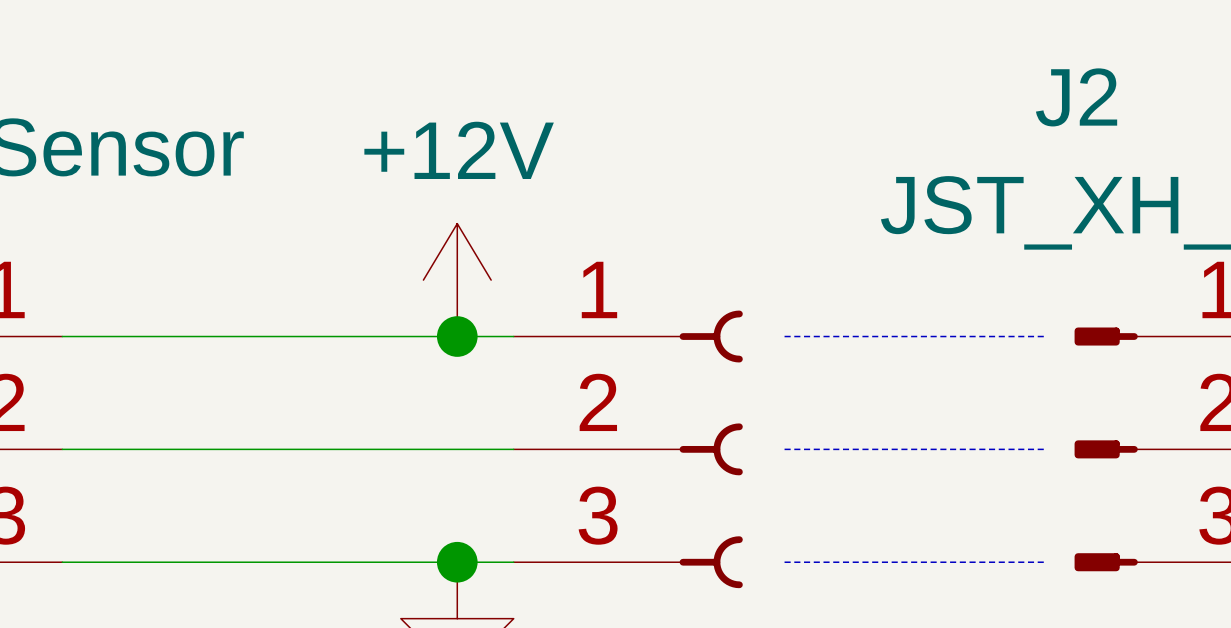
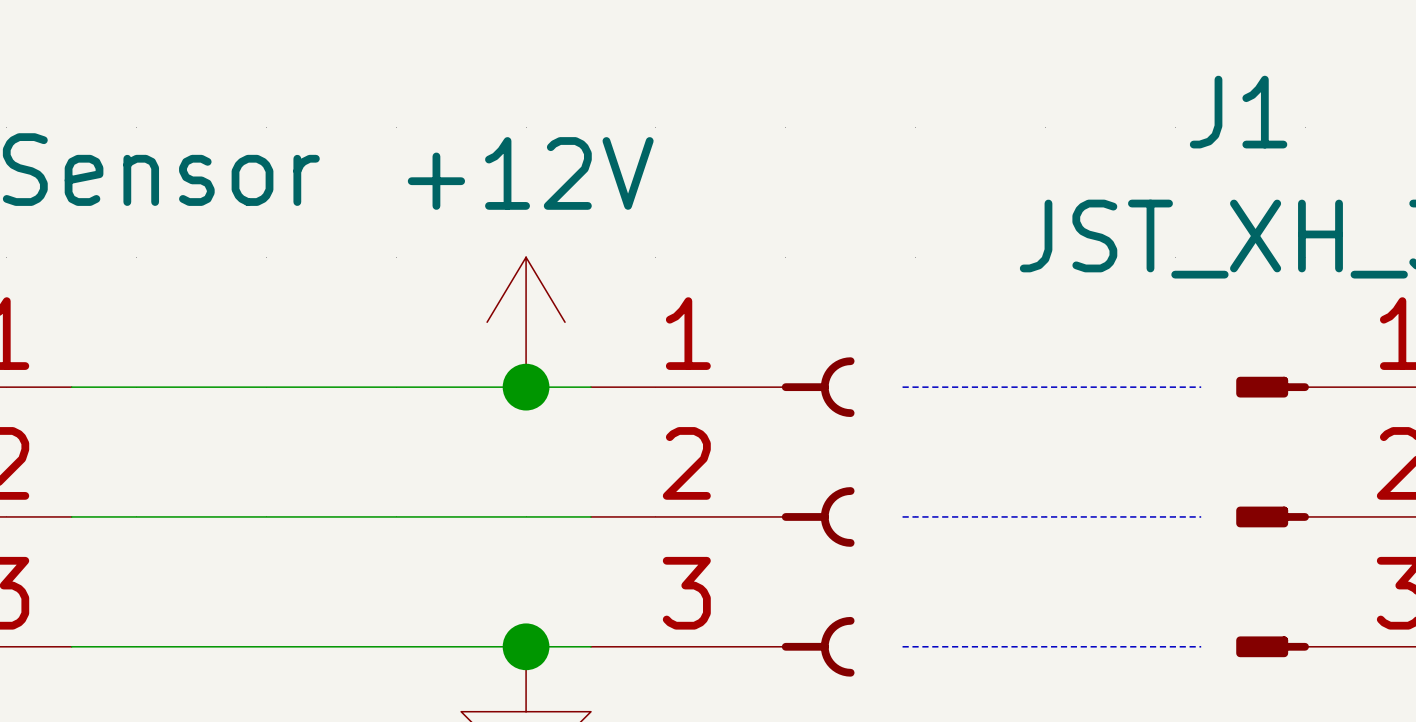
J2 name: J2 (1076, 97) -> J1 (1238, 112)

